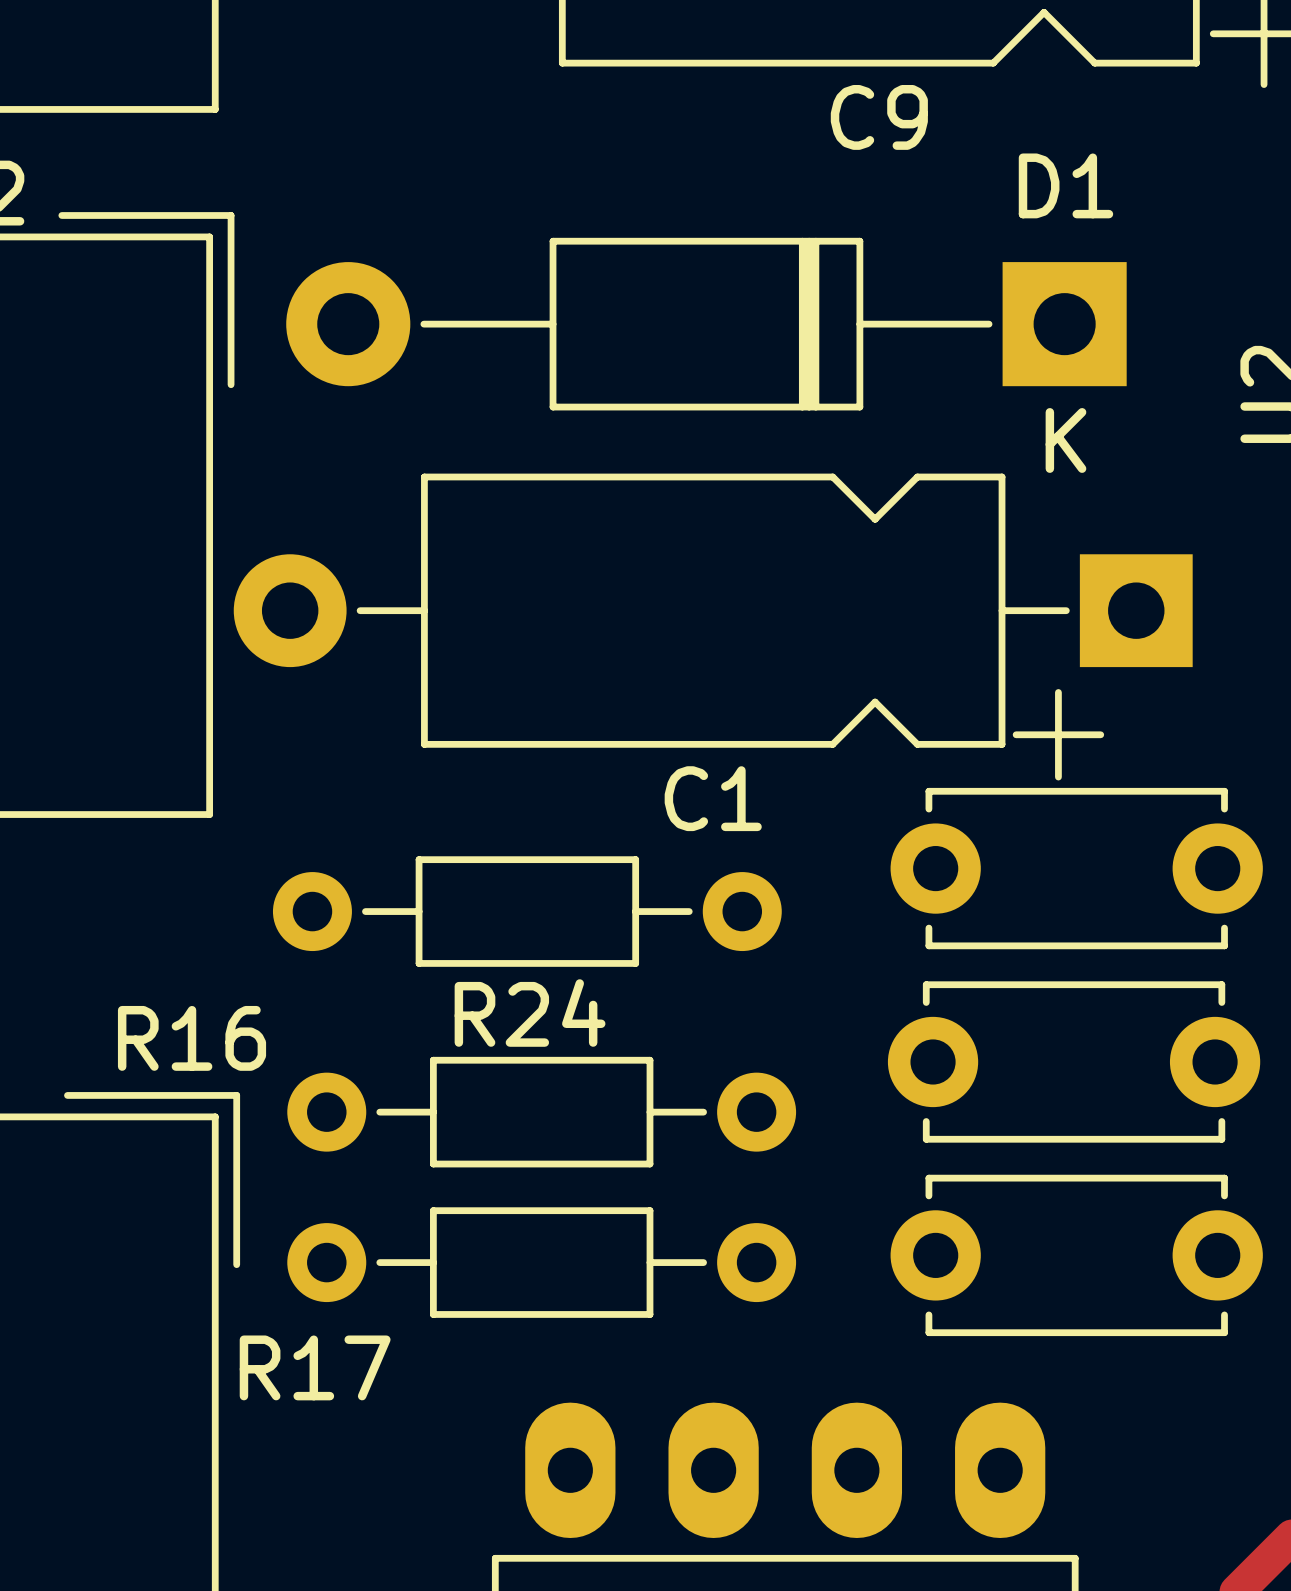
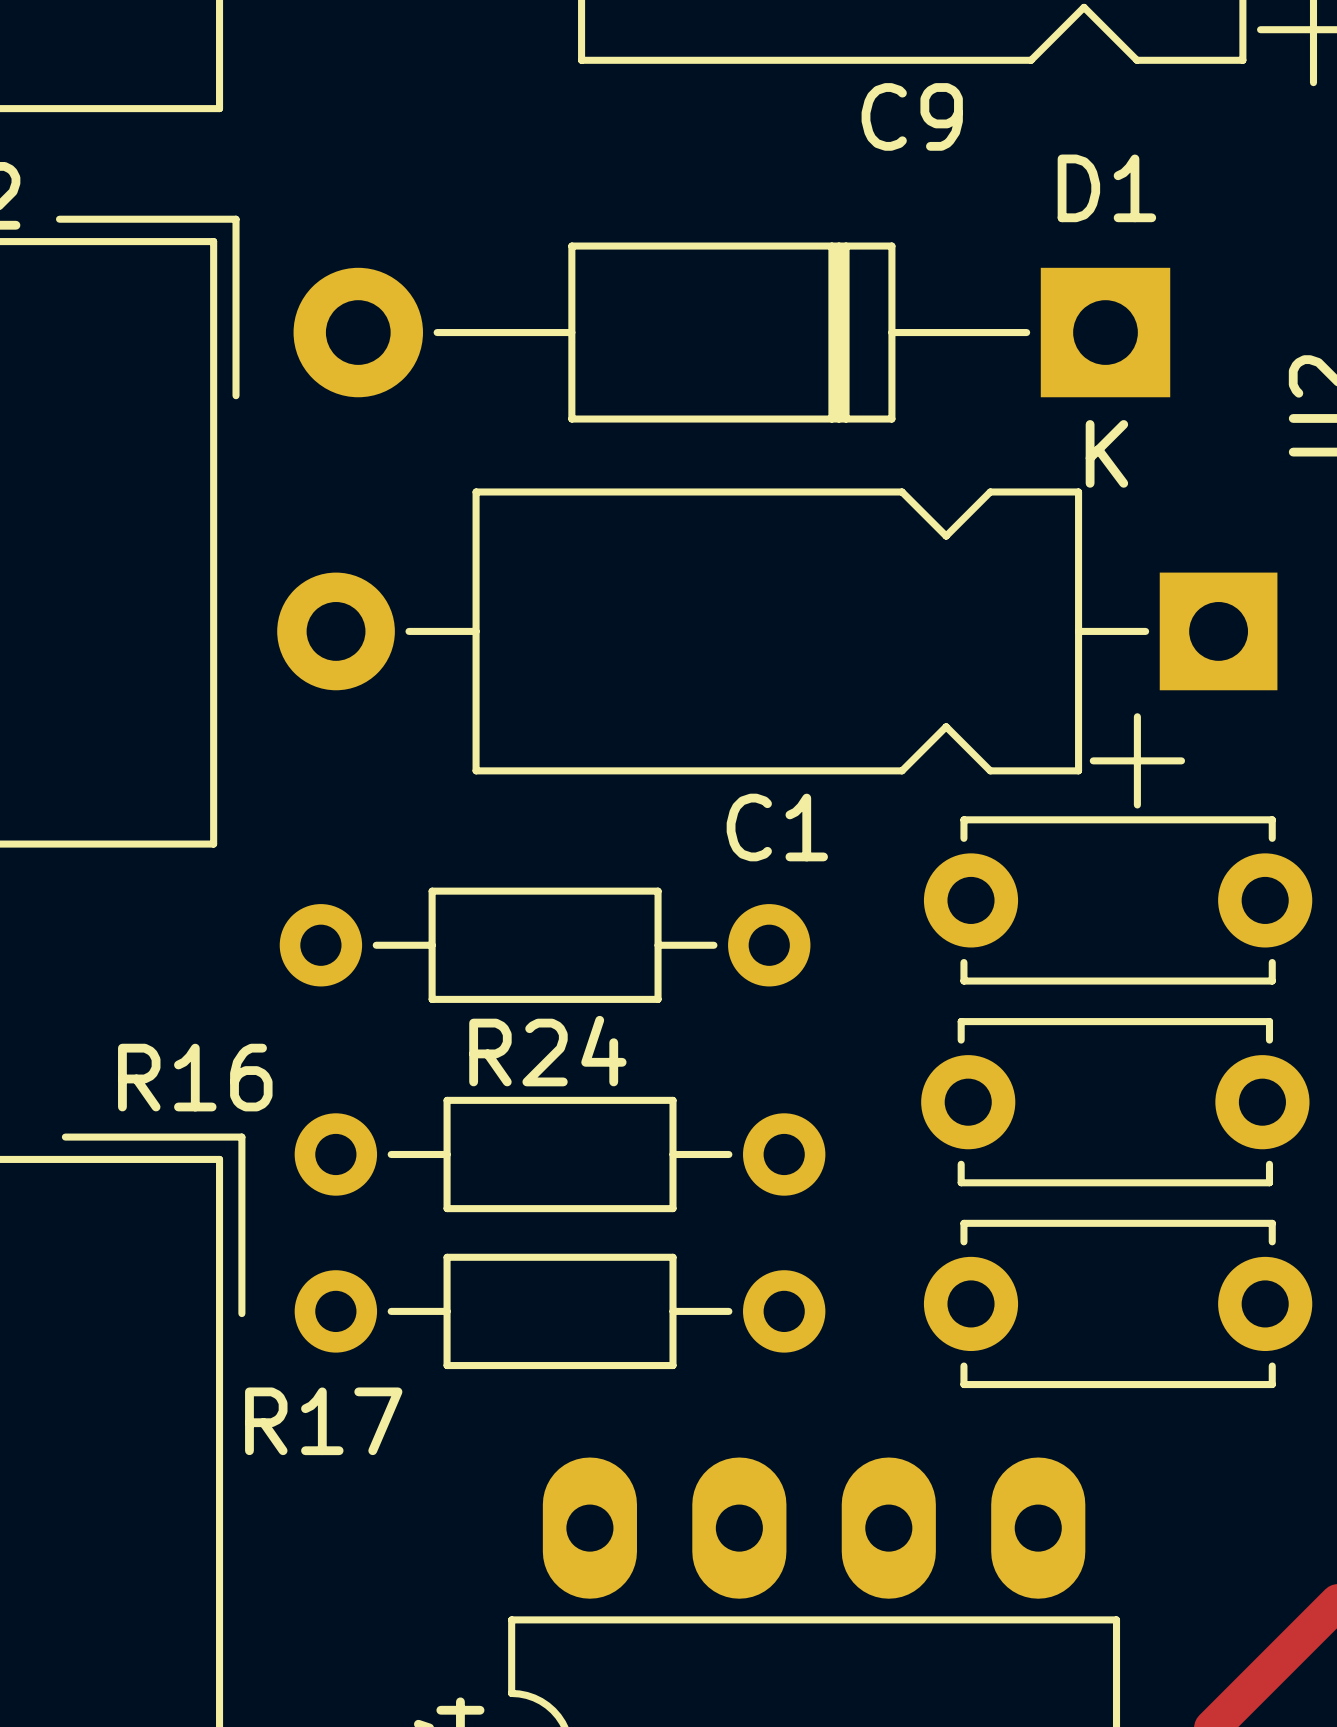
C1 position: (713, 627) -> (777, 648)

